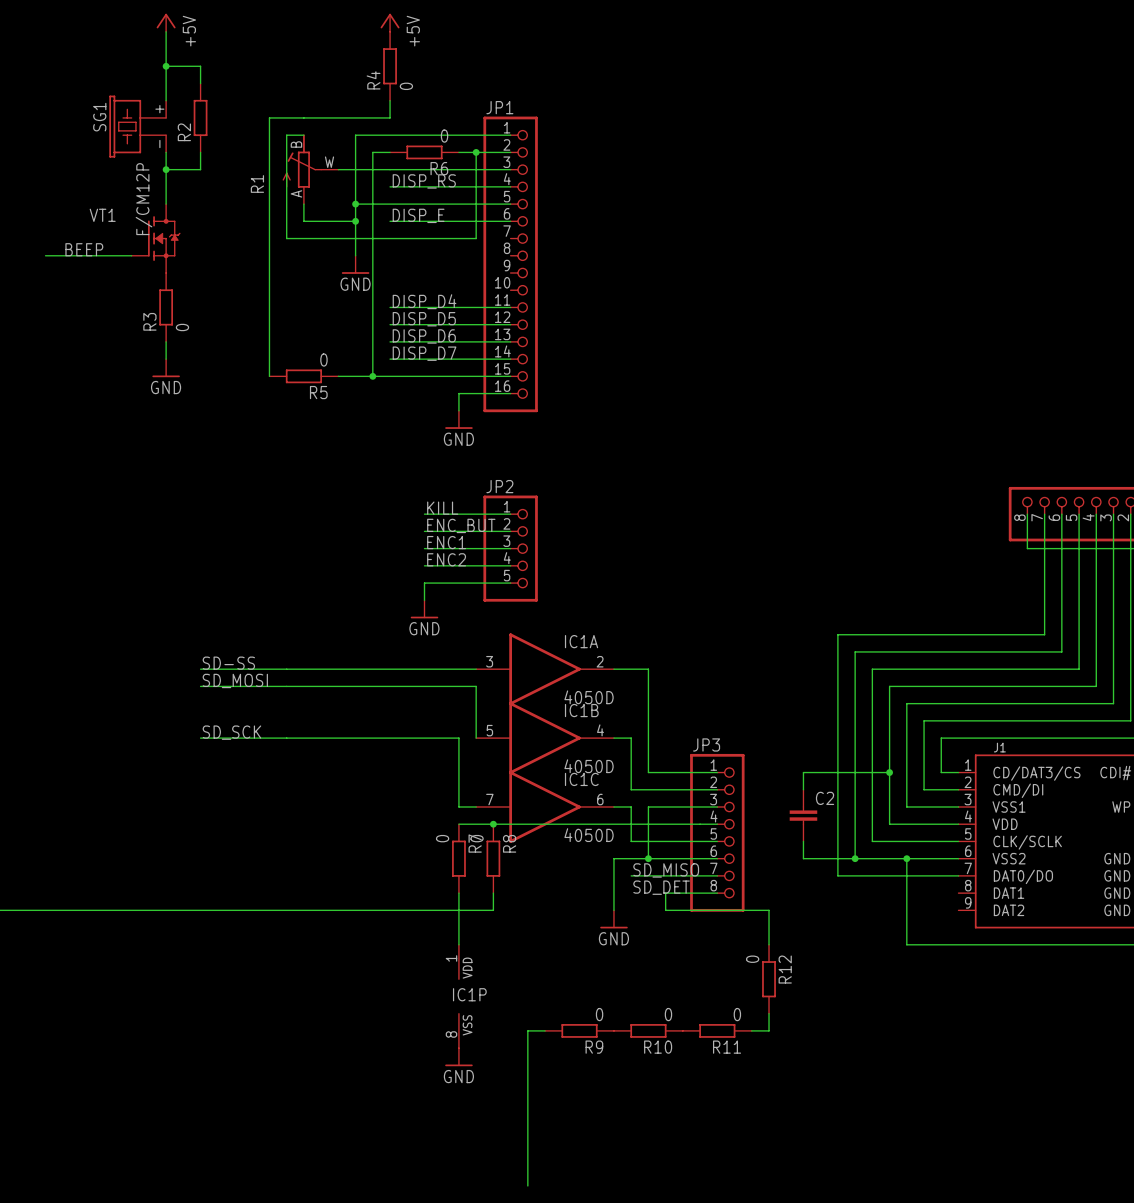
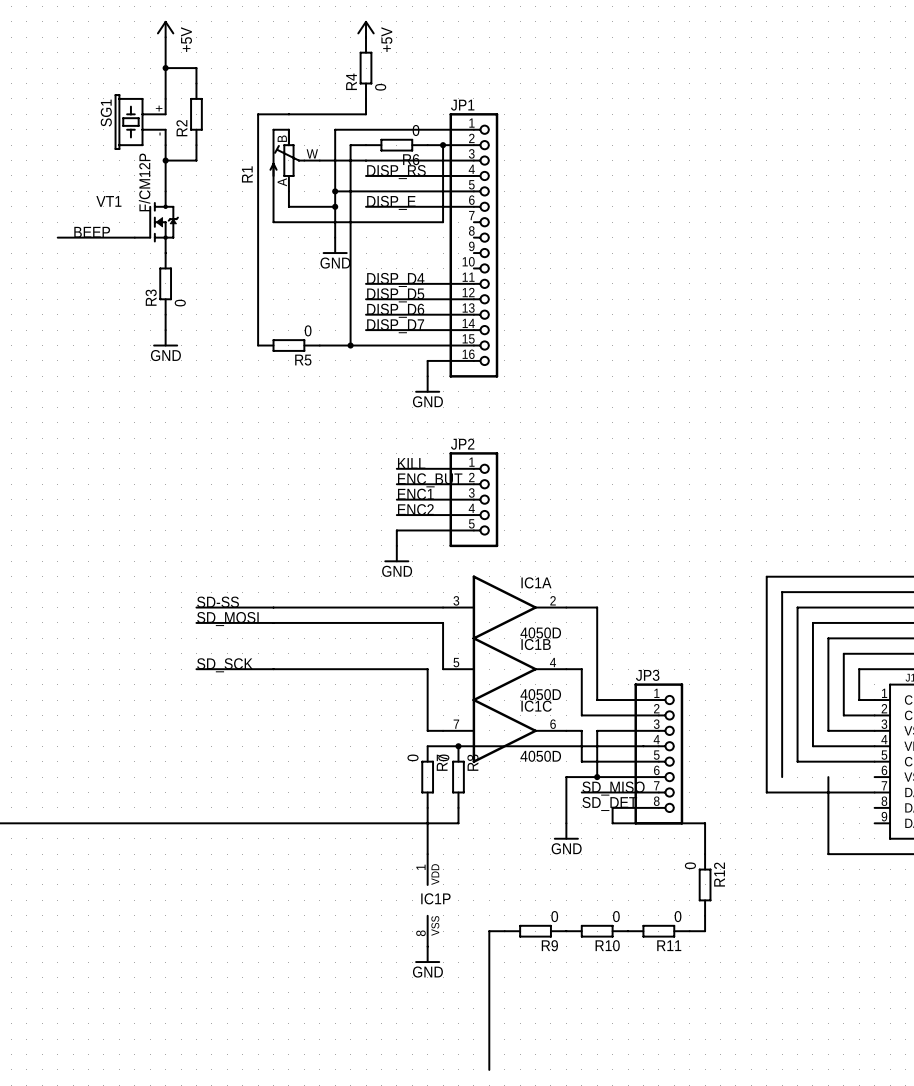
wire: (889, 772) (803, 772) (803, 789) -> none
junction: (889, 772) -> none
C2: (803, 815) -> none
wire: (803, 841) (803, 858) (958, 858) -> none
junction: (855, 858) -> none
junction: (906, 858) -> none

